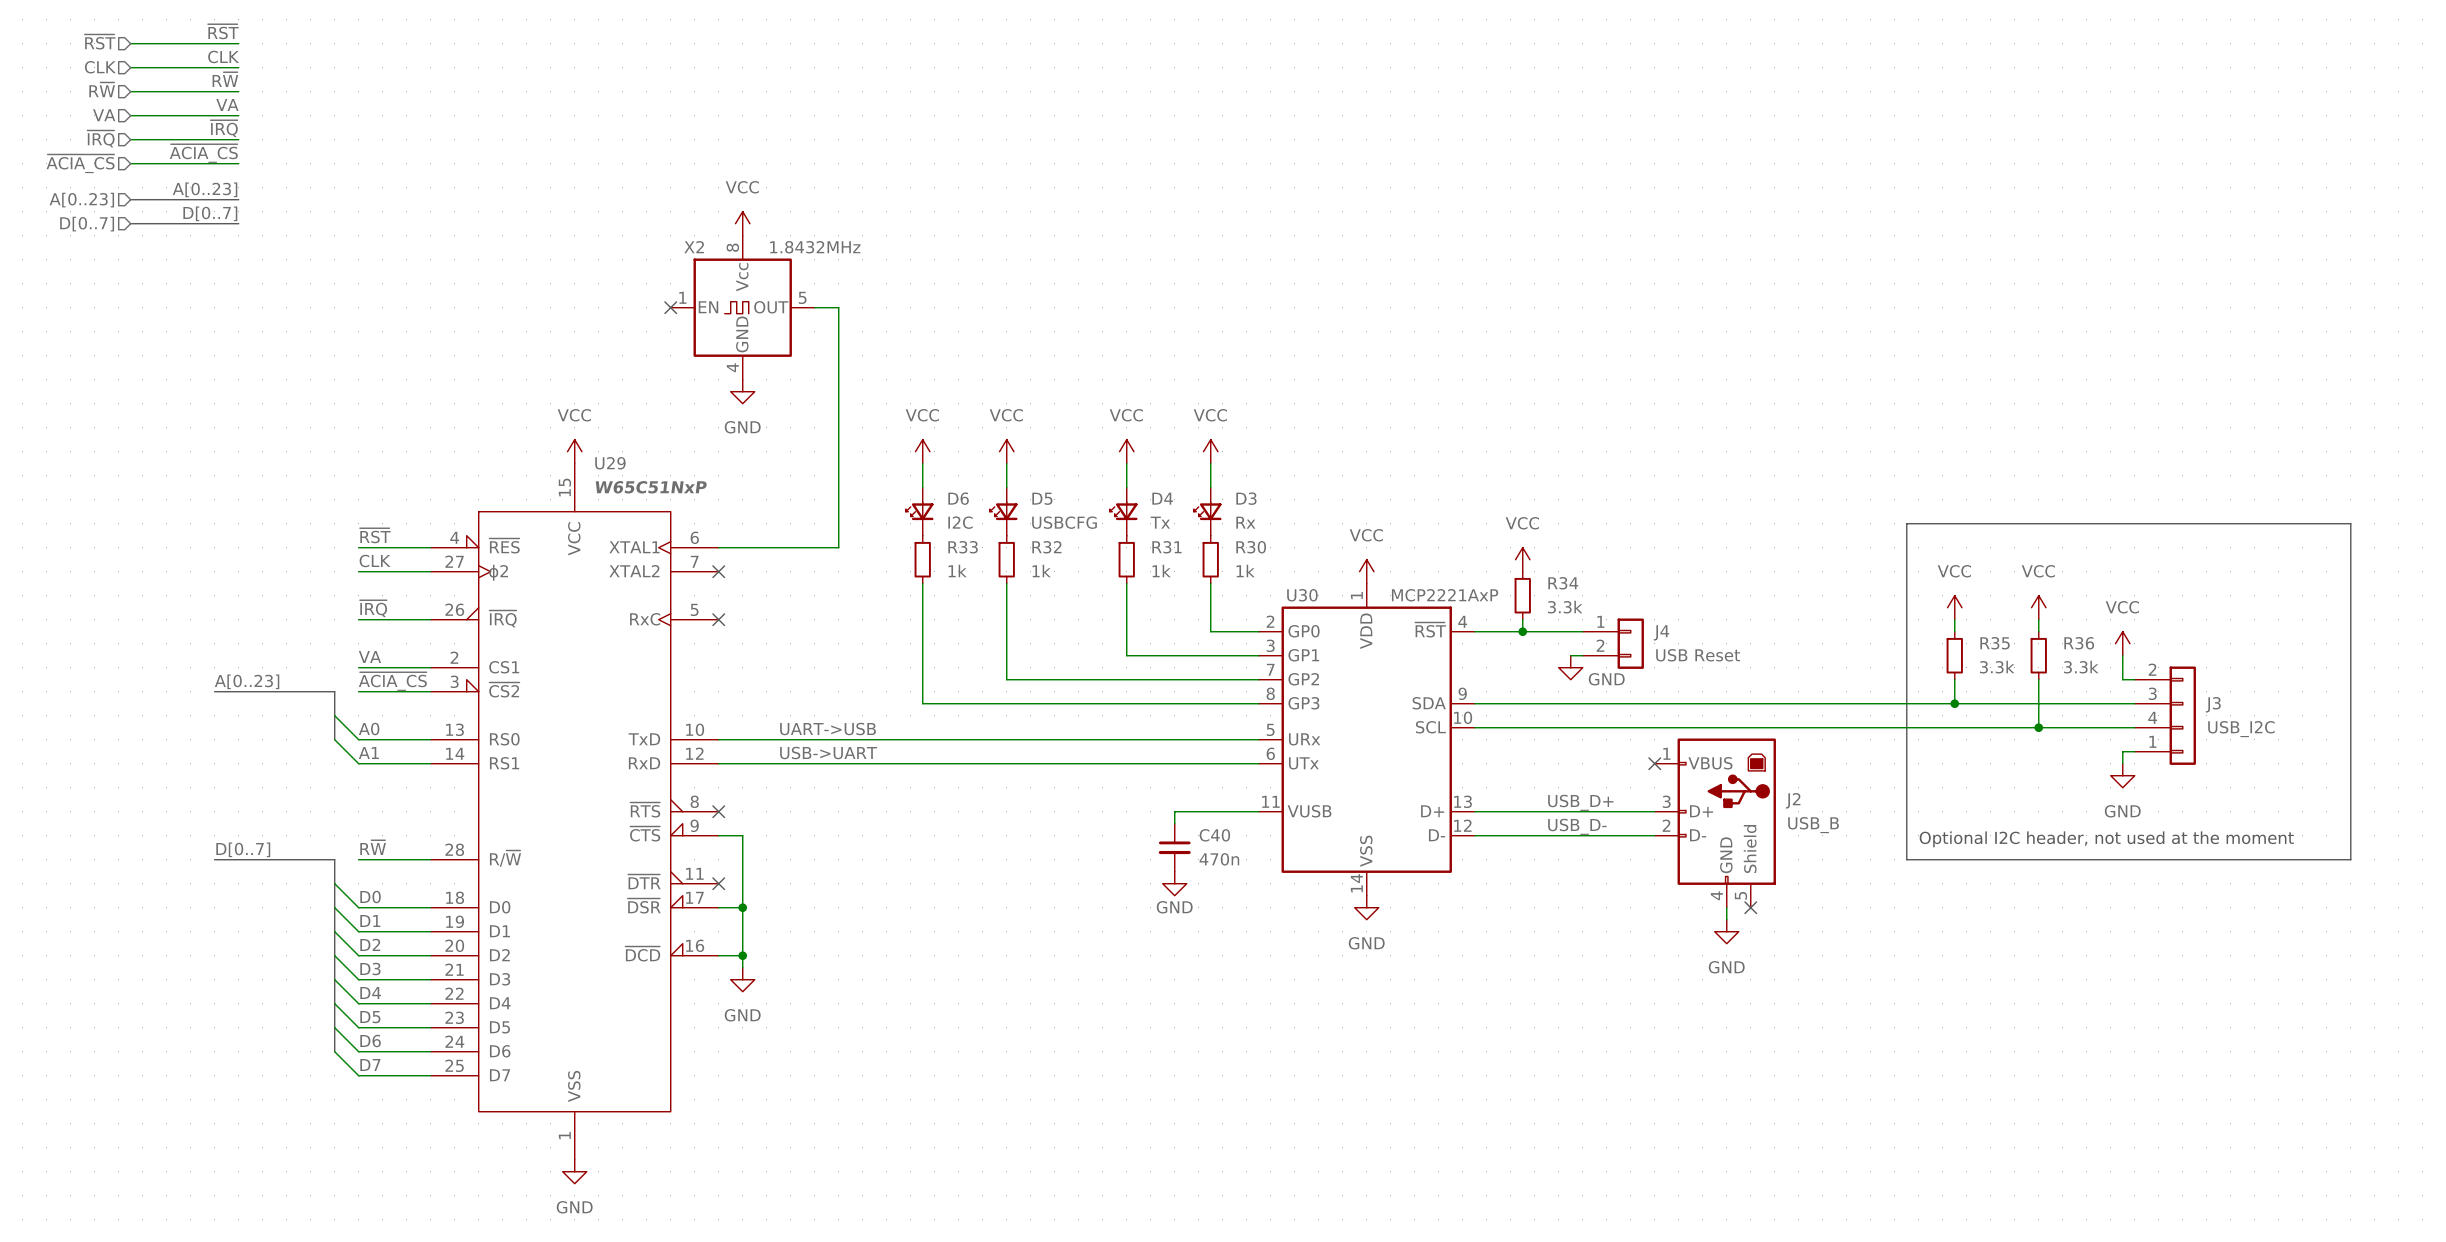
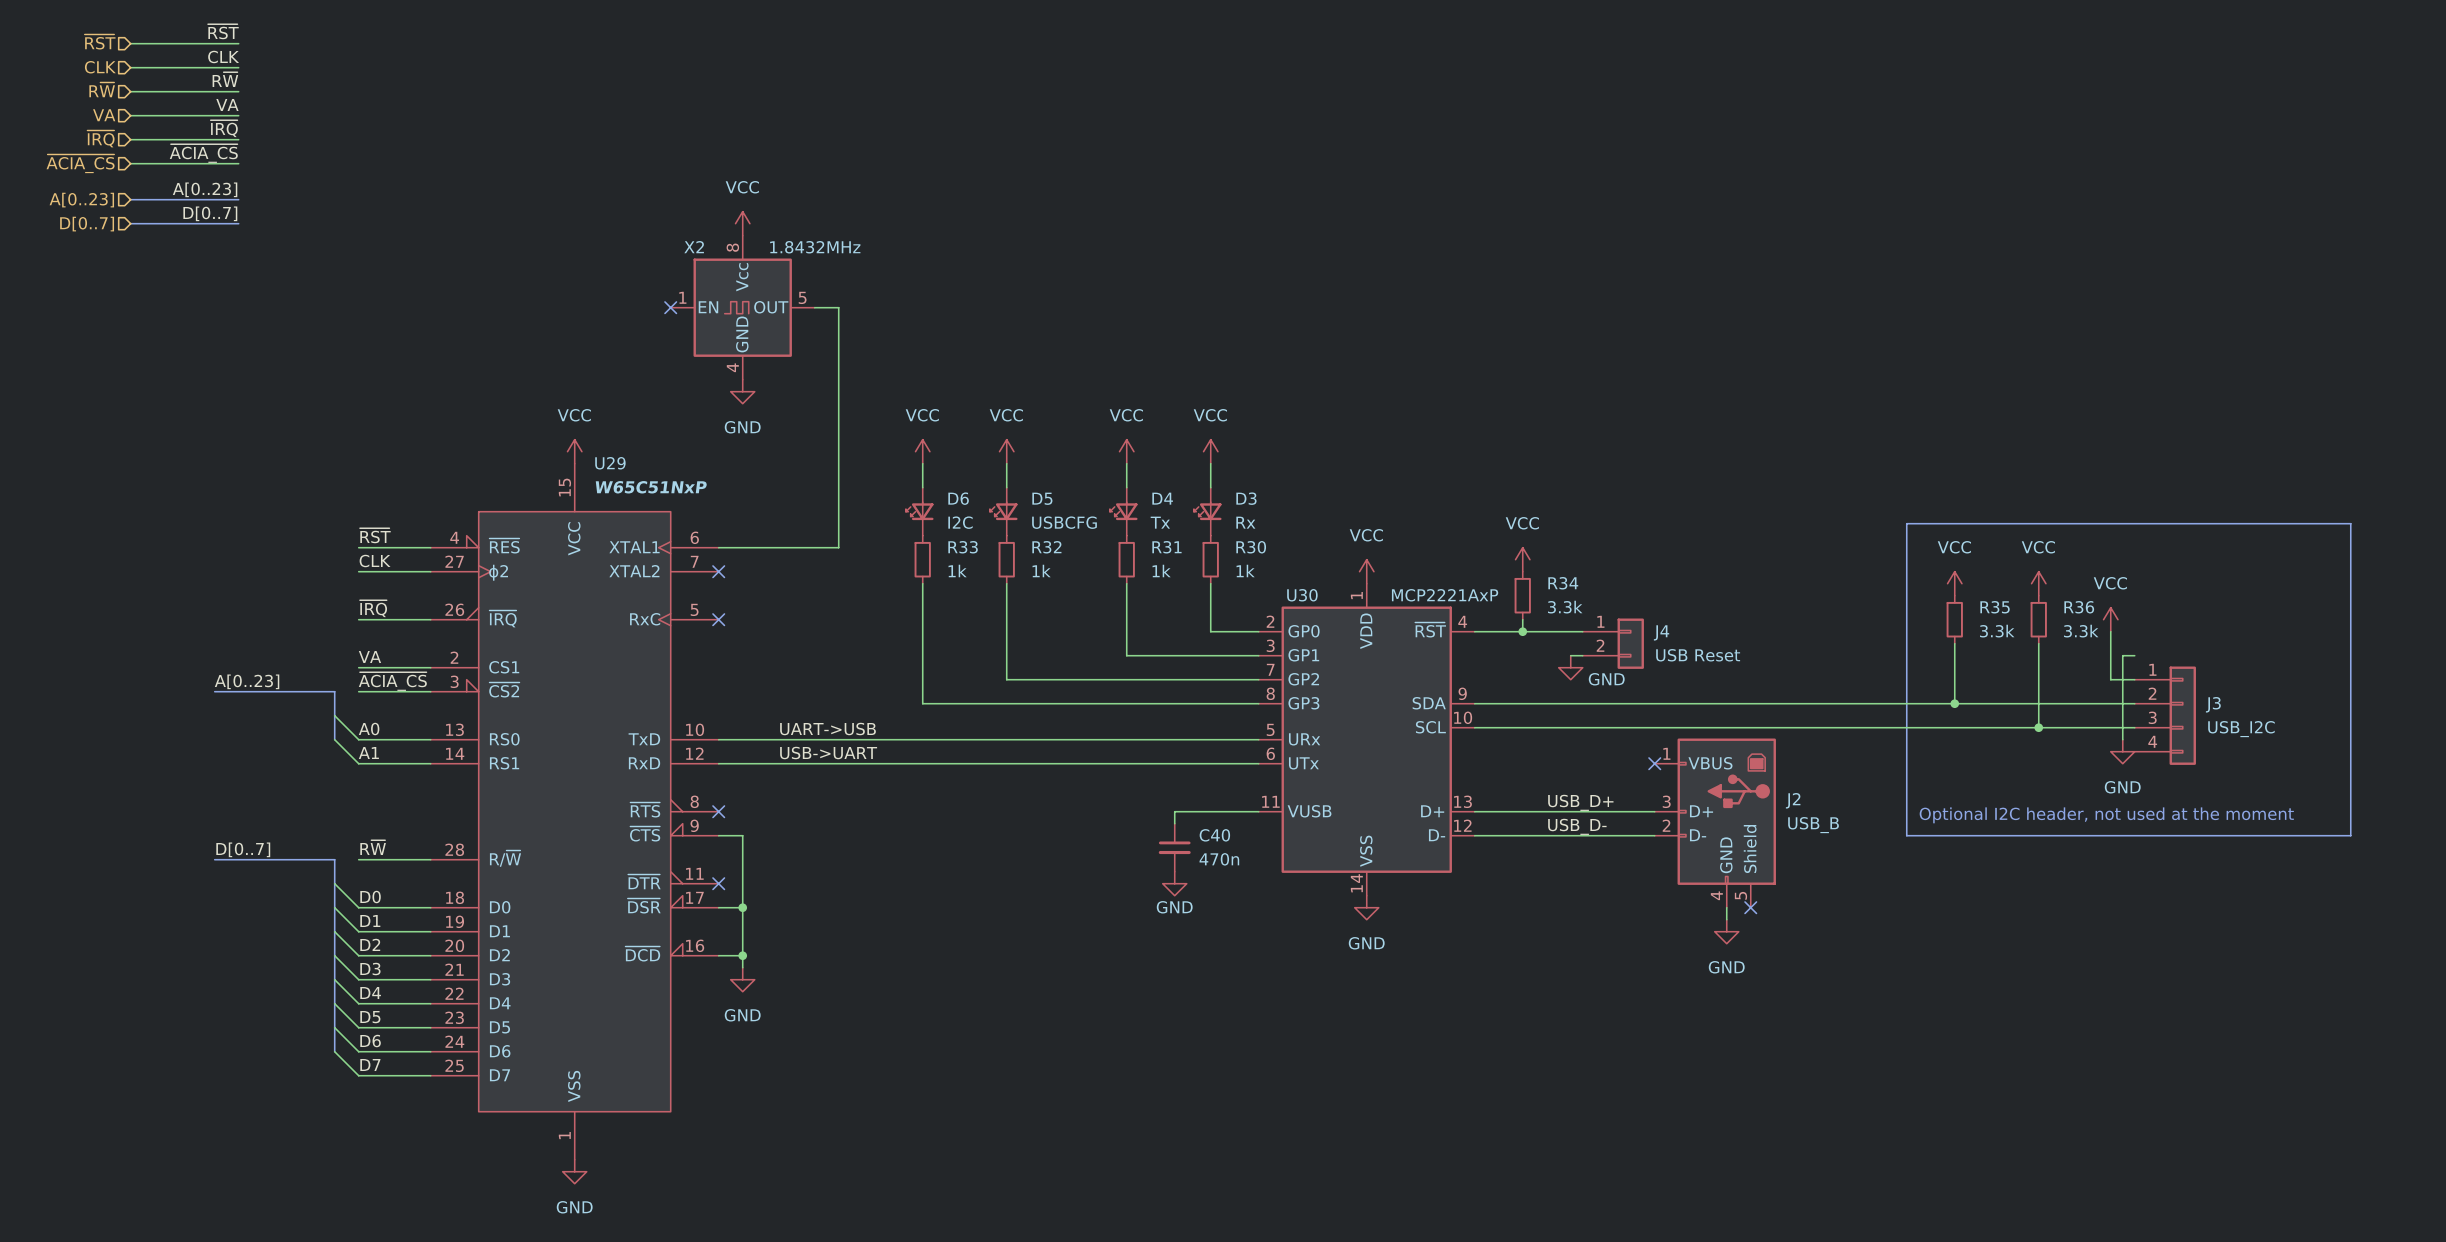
power symbol position: VCC (1954, 607) -> VCC (1954, 583)
power symbol position: VCC (2038, 607) -> VCC (2038, 583)
wire: (1954, 619) (1954, 631) -> none
wire: (2038, 619) (2038, 631) -> none
wire: none -> (2110, 631) (2110, 679) (2122, 679) (2122, 739)
wire: none -> (1954, 643) (1954, 679)
wire: none -> (2038, 643) (2038, 679)
power symbol position: VCC (2122, 643) -> VCC (2110, 619)
R35 position: (1954, 655) -> (1954, 619)
R36 position: (2038, 655) -> (2038, 619)
wire: none -> (2122, 655) (2134, 655)
J3 pin number: 2 (2152, 669) -> 1 (2152, 669)
J3 pin number: 3 (2152, 693) -> 2 (2152, 693)
J3 pin number: 4 (2152, 717) -> 3 (2152, 717)
J3 pin number: 1 (2152, 741) -> 4 (2152, 741)
power symbol position: GND (2122, 775) -> GND (2122, 751)
line: (1906, 835) (1906, 859) (2350, 859) (2350, 835) -> (1906, 835) (2350, 835)
text position: Optional I2C header, not used at the moment (2106, 839) -> Optional I2C header, not used at the moment (2106, 815)

